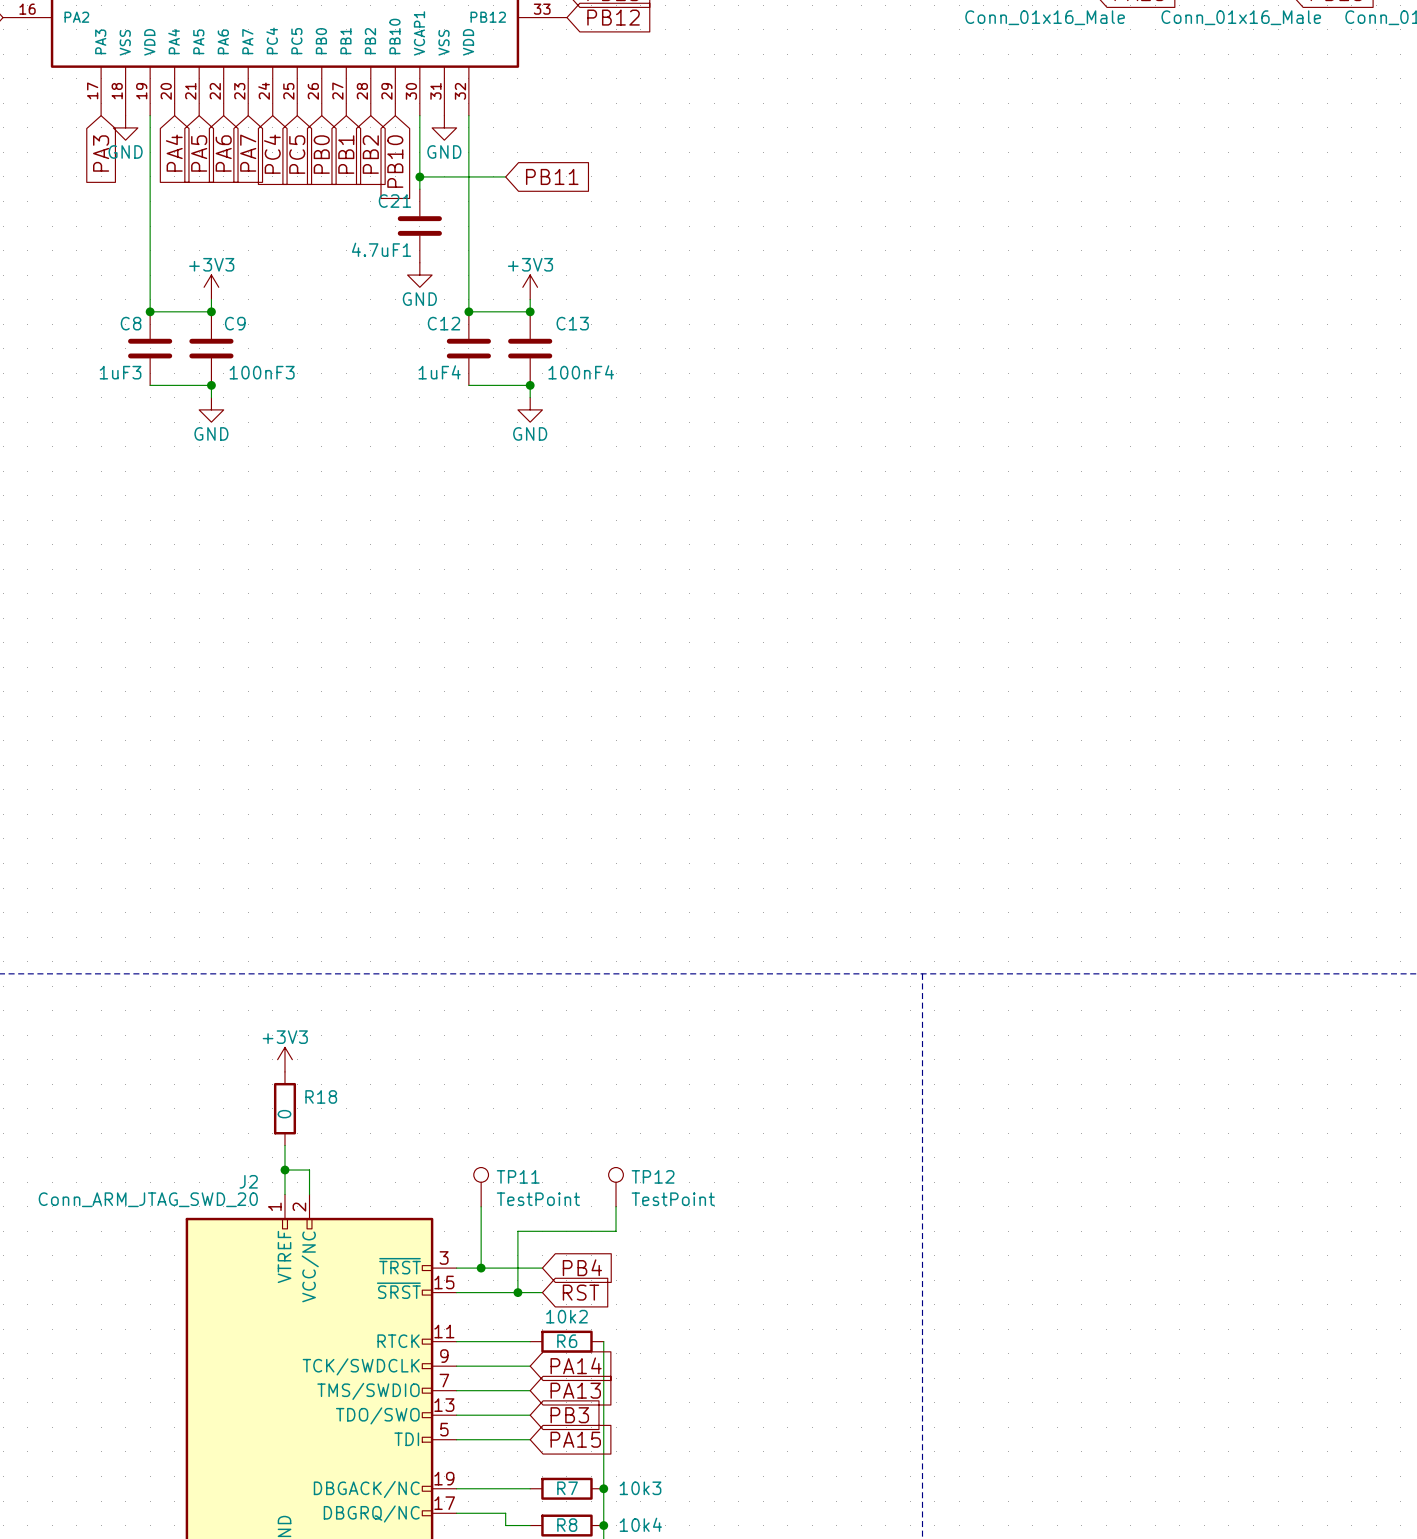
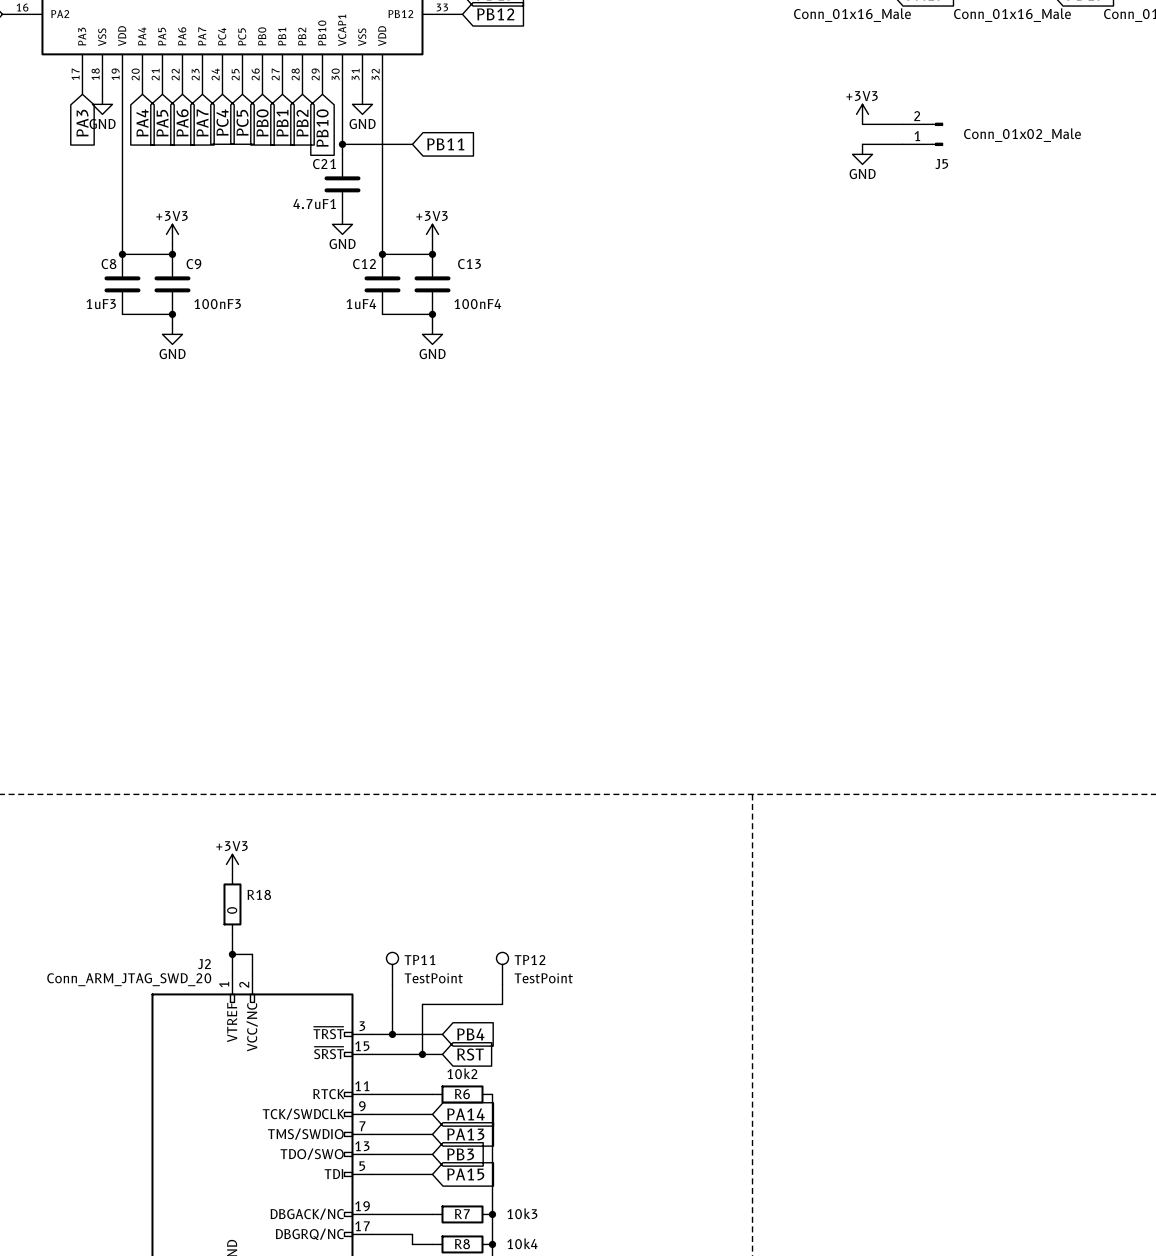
power symbol: none -> +3V3 (862, 114)
wire: none -> (862, 124) (902, 124)
J5: none -> Conn_01x02_Male (922, 134)
wire: none -> (862, 144) (902, 144)
power symbol: none -> GND (862, 154)

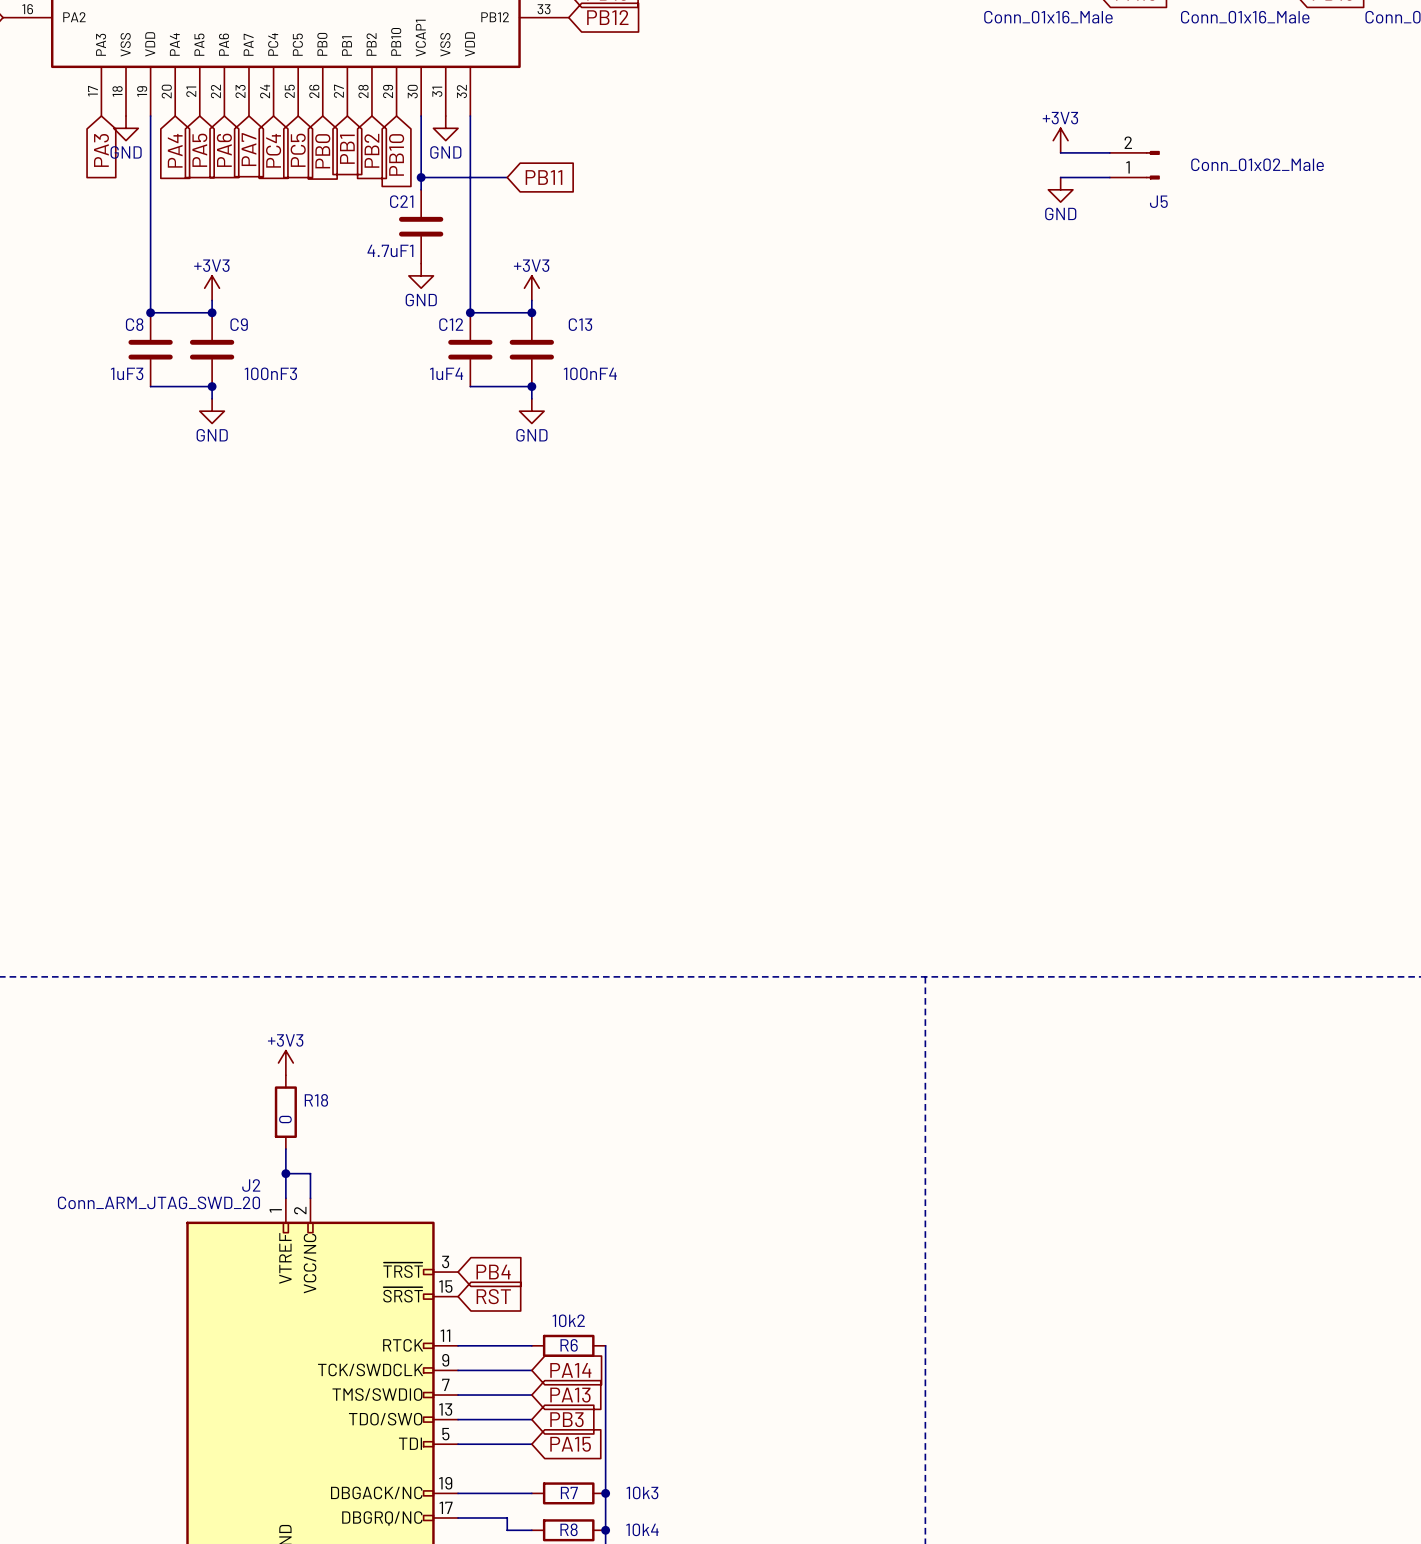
TP11: TestPoint (392, 968) -> none
TP12: TestPoint (502, 968) -> none
wire: (392, 984) (392, 1034) -> none
wire: (502, 984) (502, 1004) (422, 1004) (422, 1054) -> none
wire: (372, 1034) (442, 1034) -> none
junction: (392, 1034) -> none
global label position: PB4 (470, 1034) -> PB4 (493, 1272)
wire: (372, 1054) (442, 1054) -> none
junction: (422, 1054) -> none
global label position: RST (470, 1054) -> RST (493, 1296)

